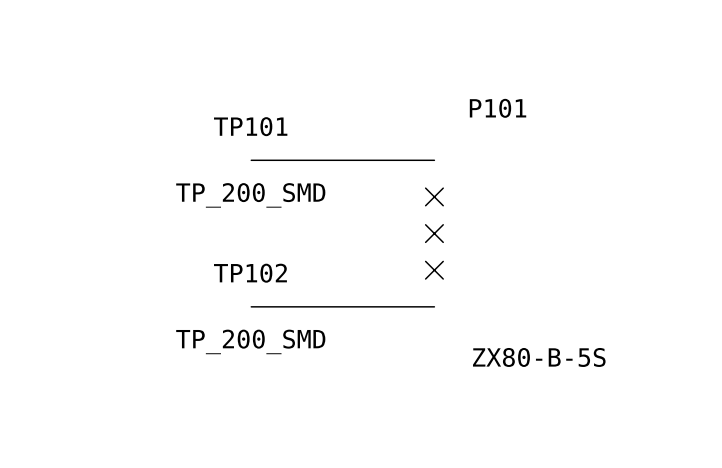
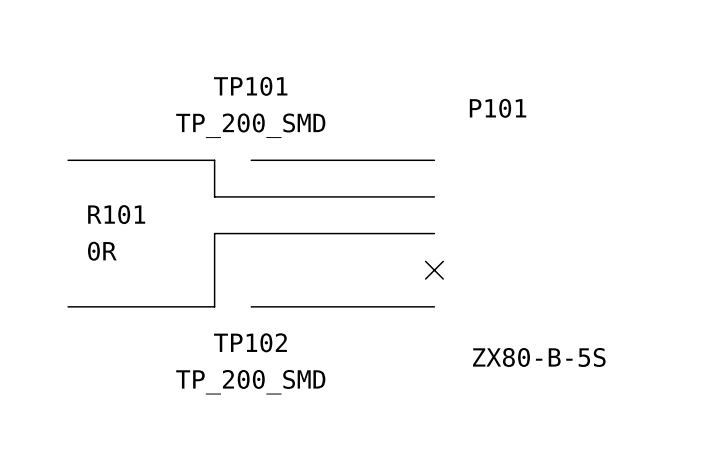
TP101 name position: TP101 (250, 126) -> TP101 (250, 86)
wire: none -> (68, 160) (214, 160) (214, 196) (434, 196)
TP101 position: (250, 162) -> (250, 107)
TP101 value position: TP_200_SMD (250, 195) -> TP_200_SMD (250, 125)
no-connect mark: (434, 196) -> none
R101: none -> 0R (116, 232)
wire: none -> (434, 233) (214, 233) (214, 306) (68, 306)
no-connect mark: (434, 233) -> none
TP102 name position: TP102 (250, 273) -> TP102 (250, 342)
TP102 position: (250, 308) -> (250, 363)
TP102 value position: TP_200_SMD (250, 341) -> TP_200_SMD (250, 382)

